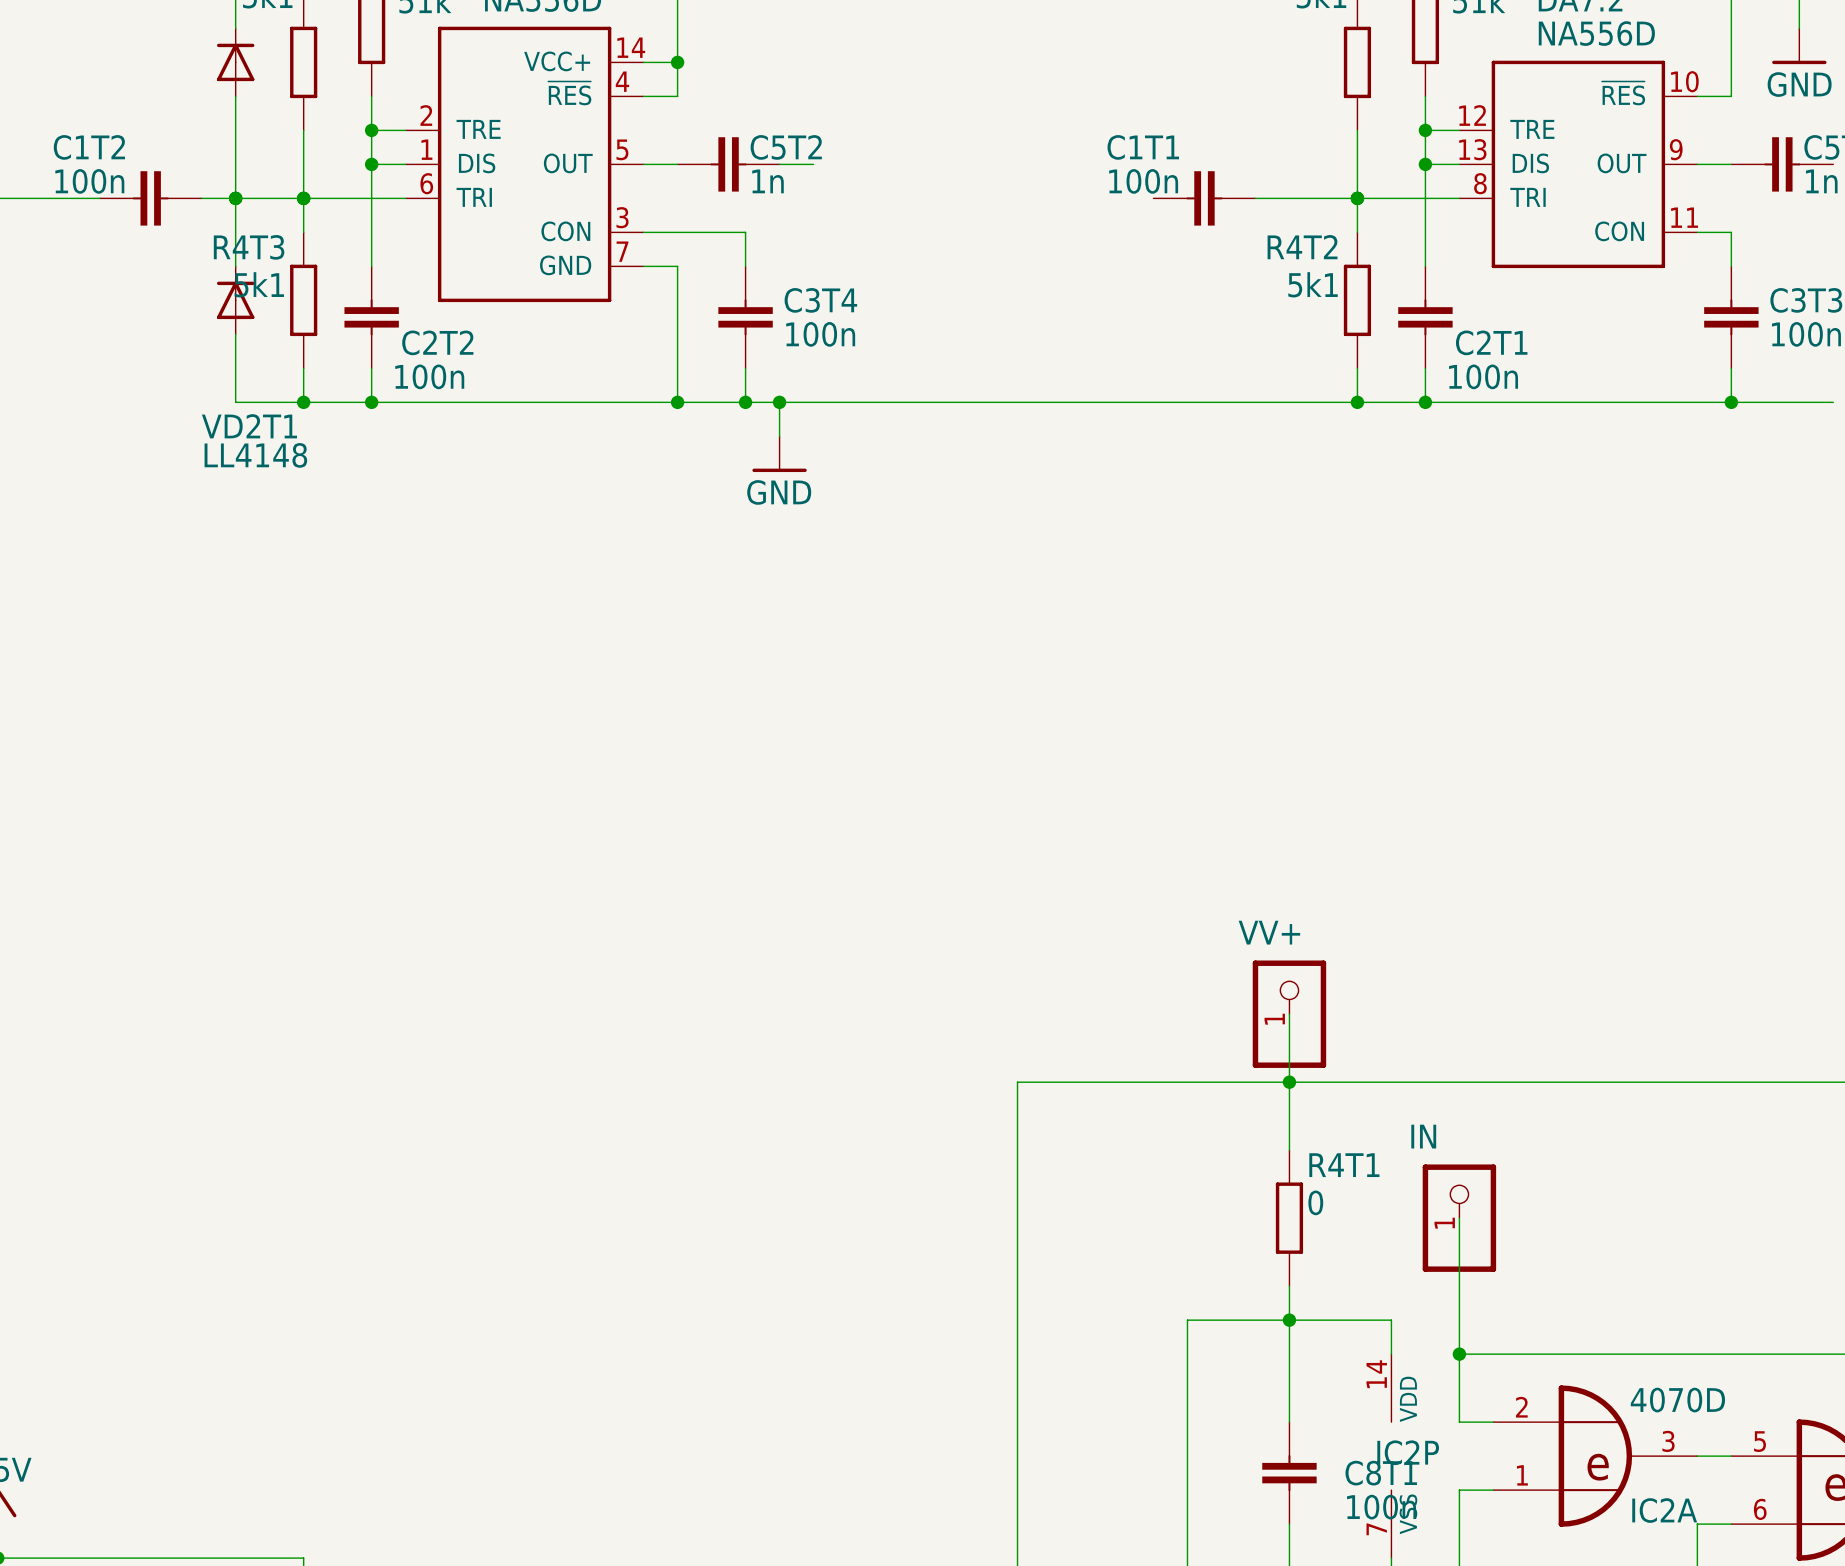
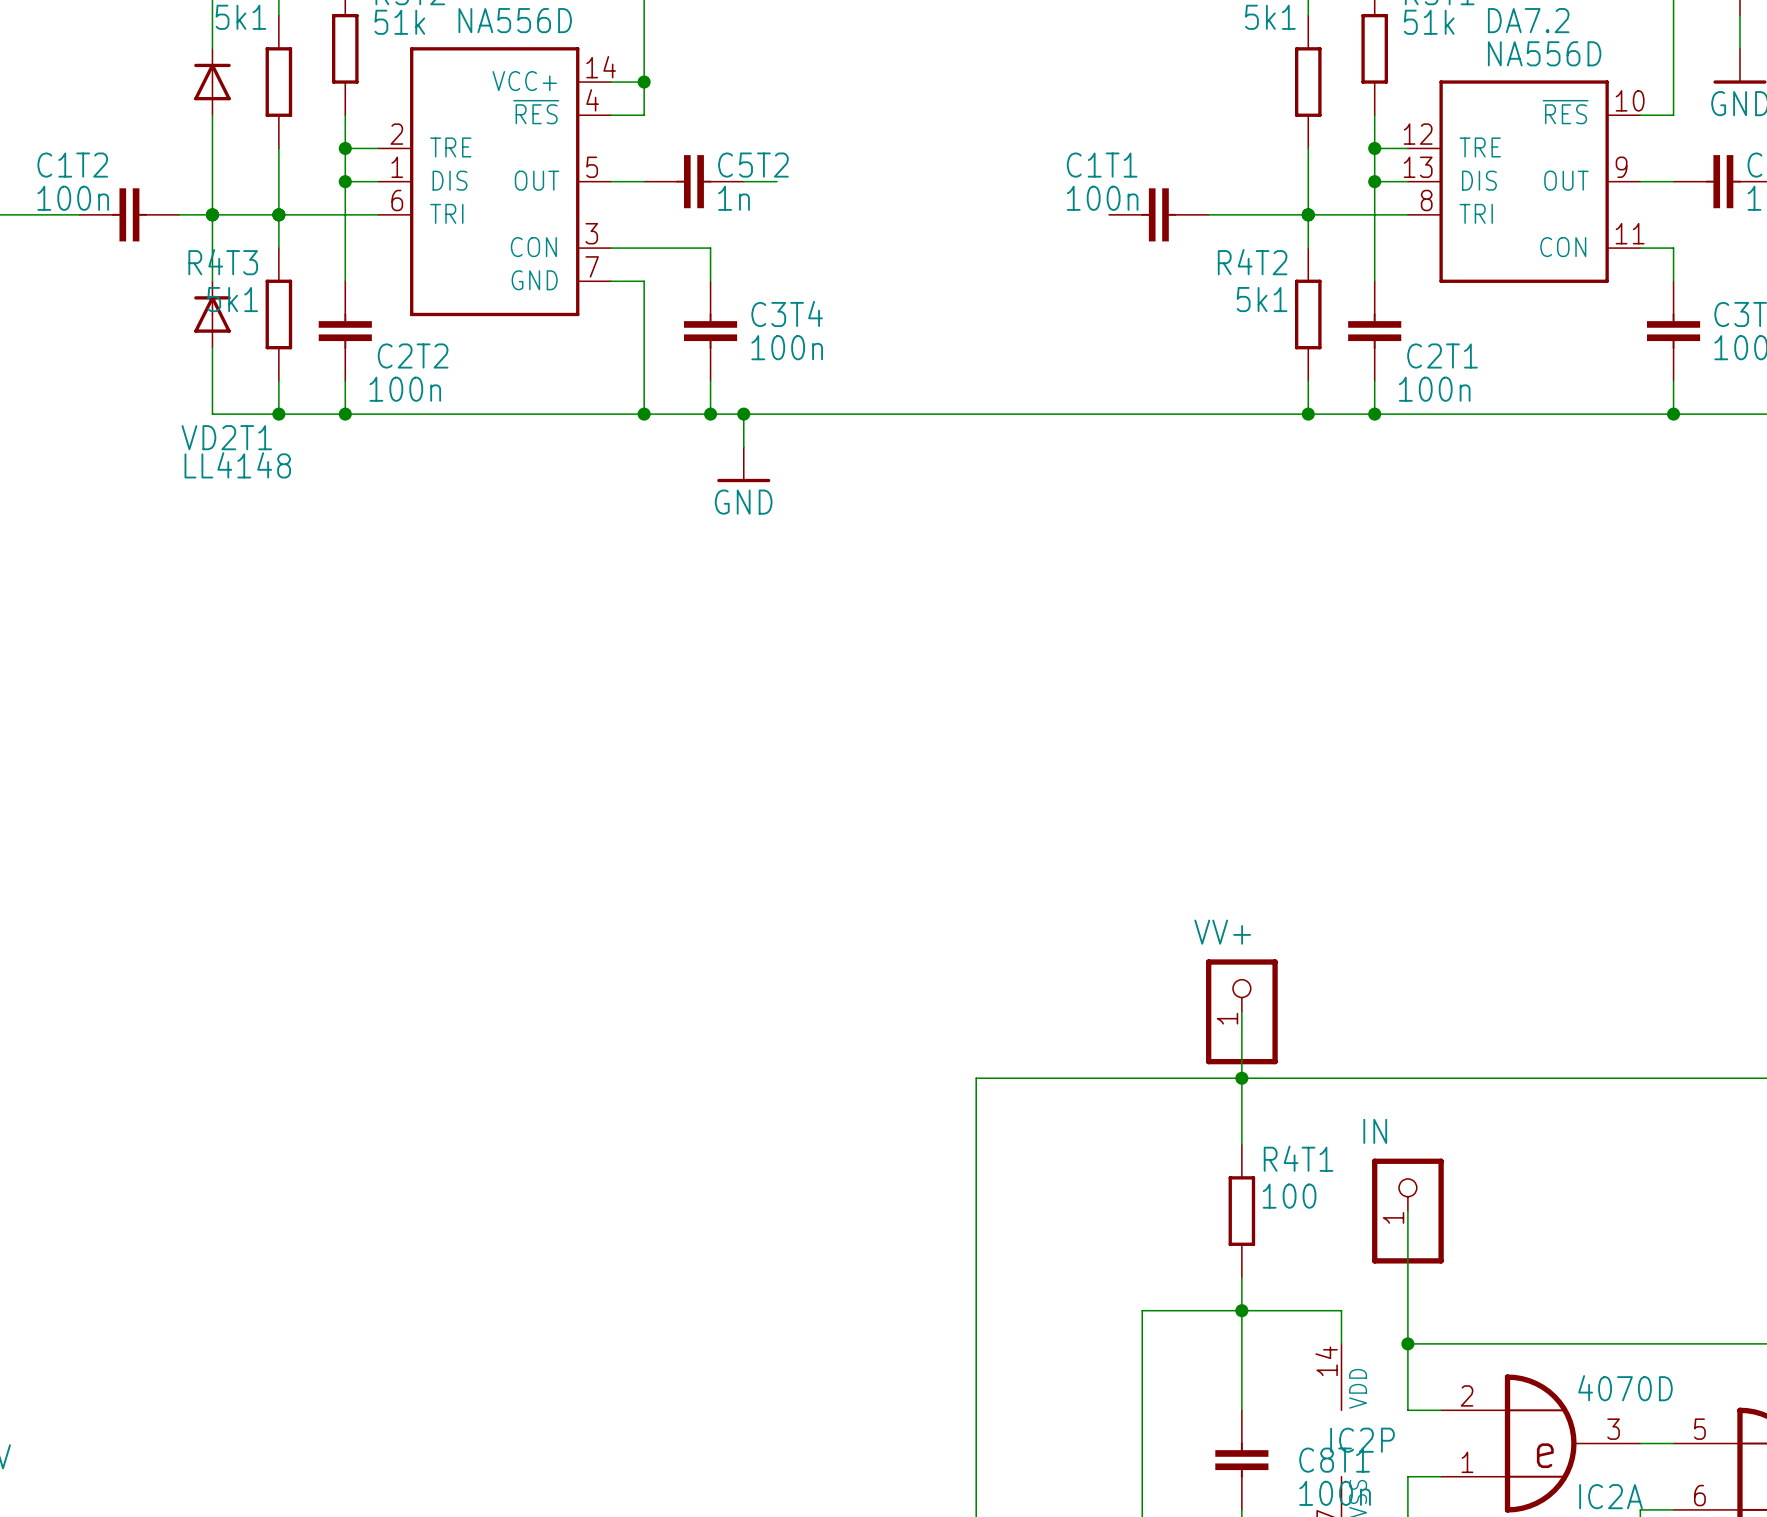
R4T1 value: 0 (1315, 1202) -> 100 (1289, 1196)

